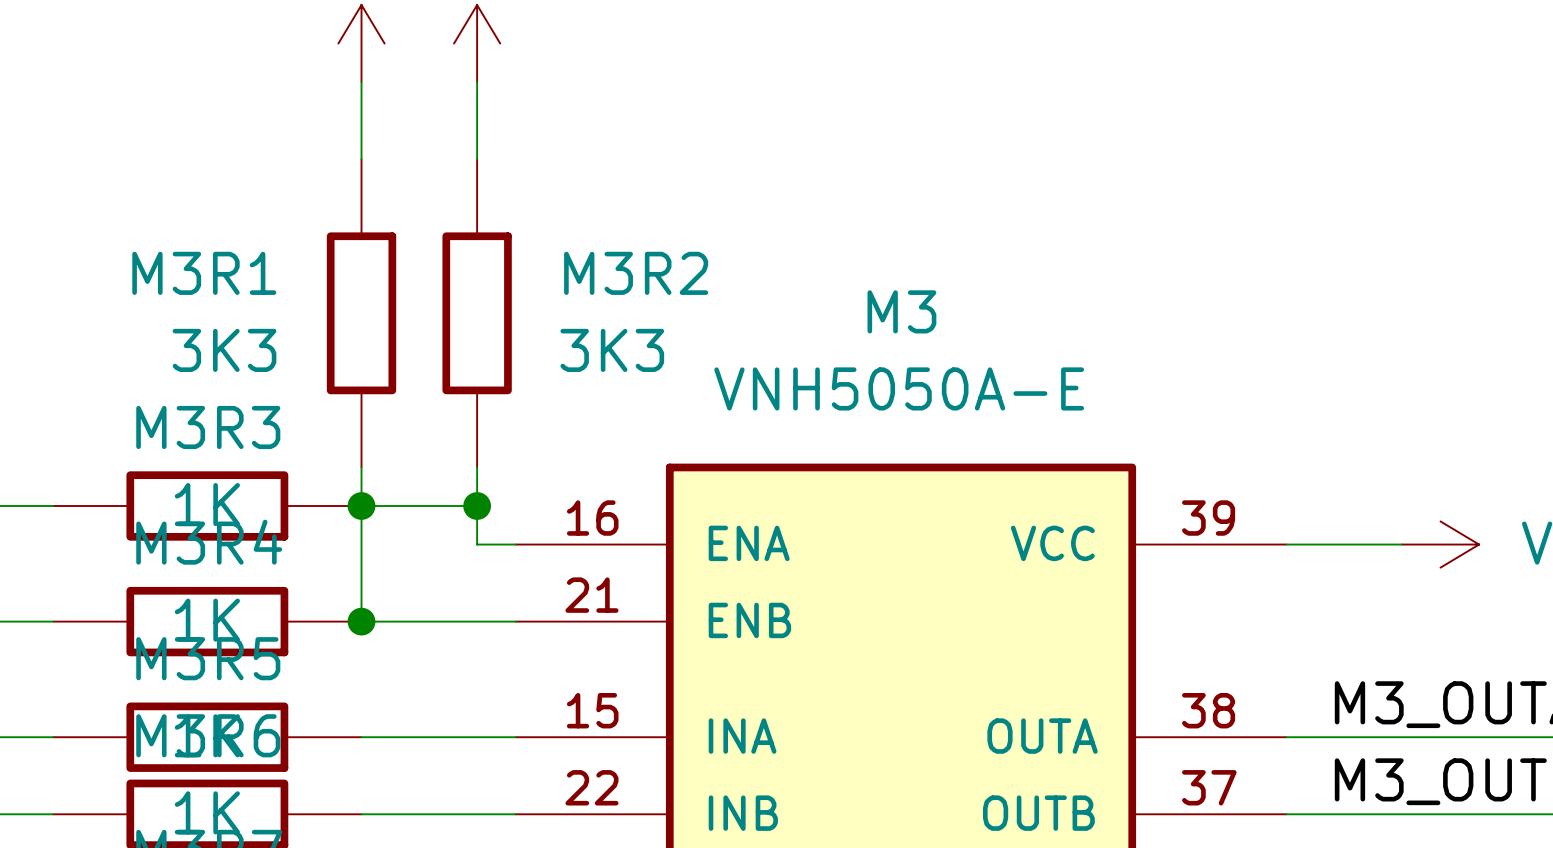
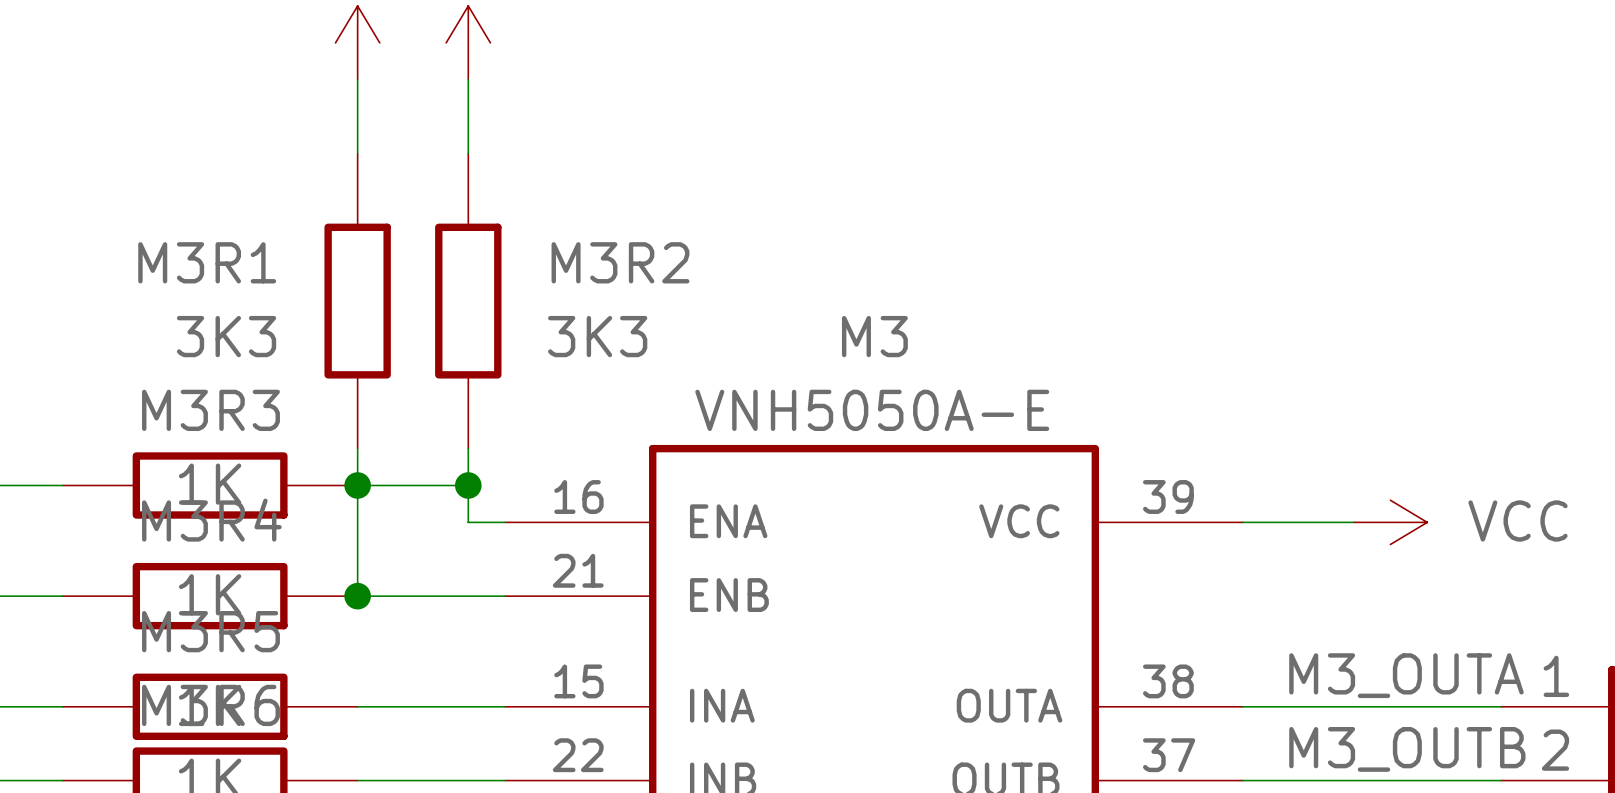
M3 name position: M3 (901, 311) -> M3 (874, 336)
M3 value position: VNH5050A-E (899, 388) -> VNH5050A-E (872, 410)

